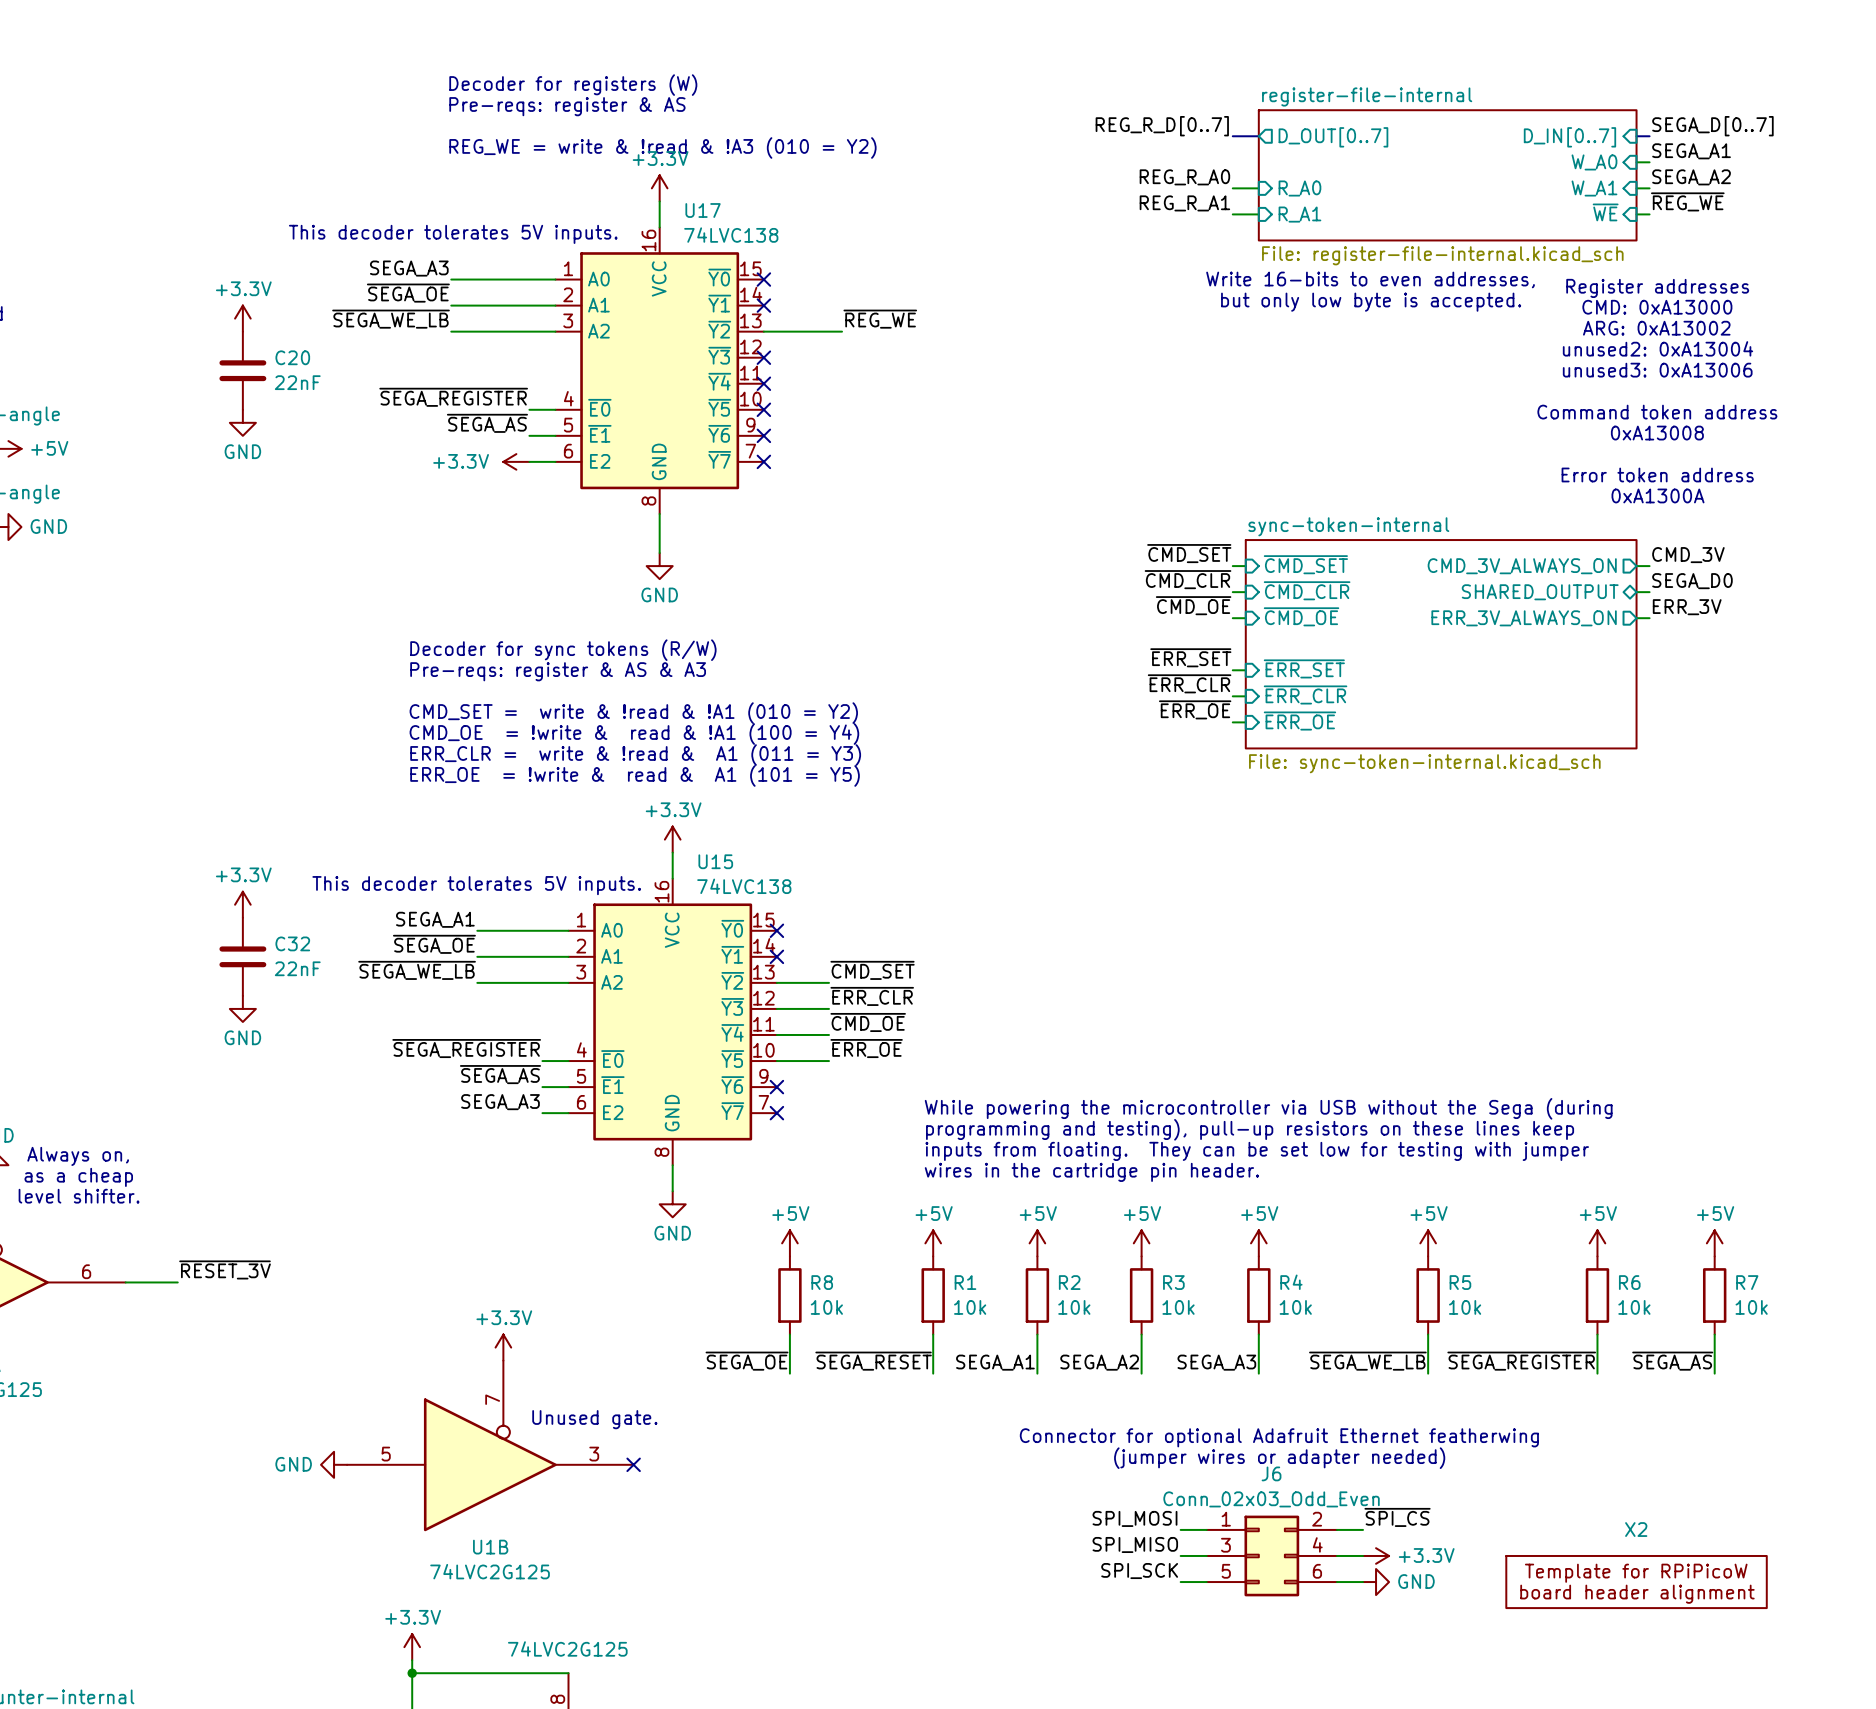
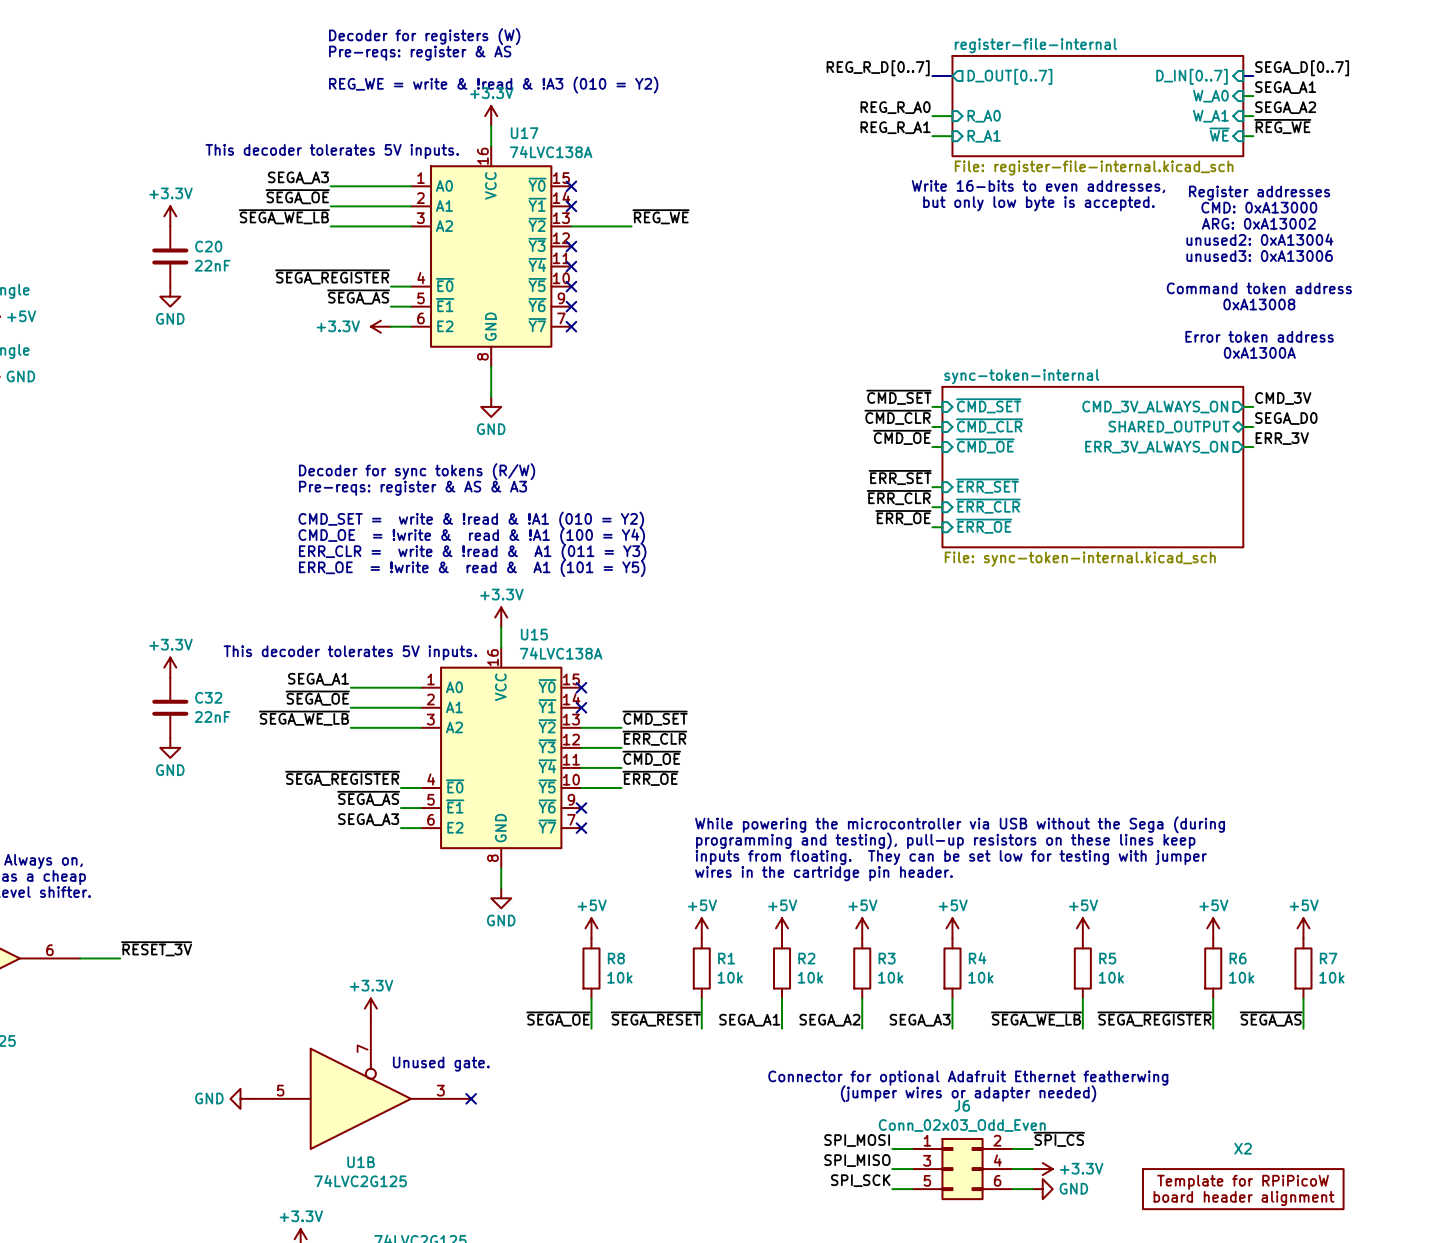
U17 value: 74LVC138 (731, 235) -> 74LVC138A (551, 152)
U15 value: 74LVC138 (744, 886) -> 74LVC138A (561, 653)

